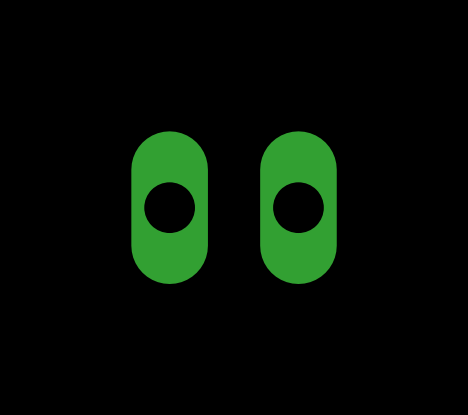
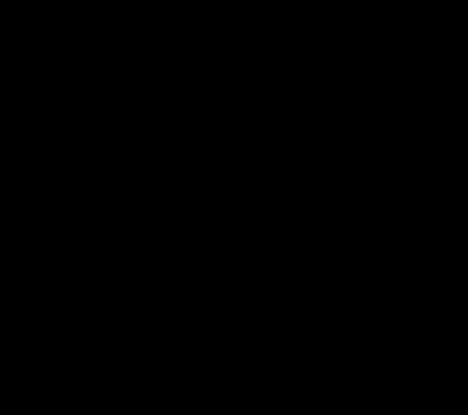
part: (234, 207) -> none

